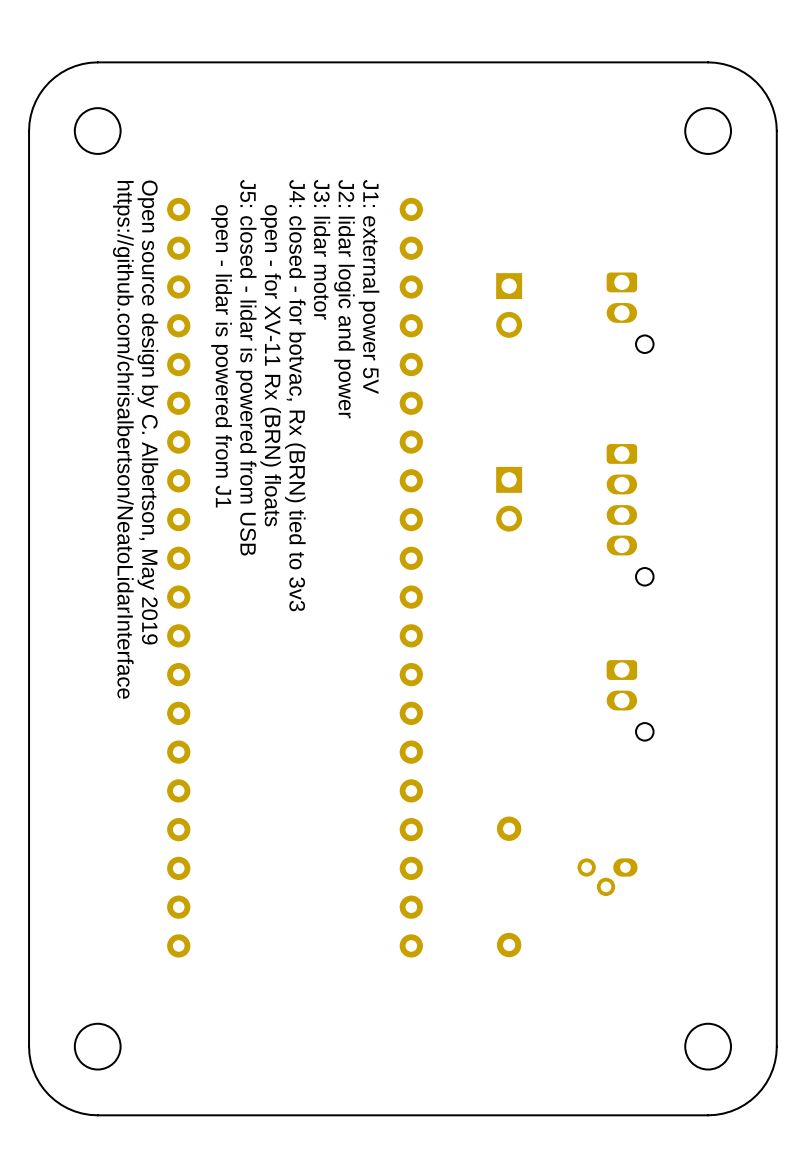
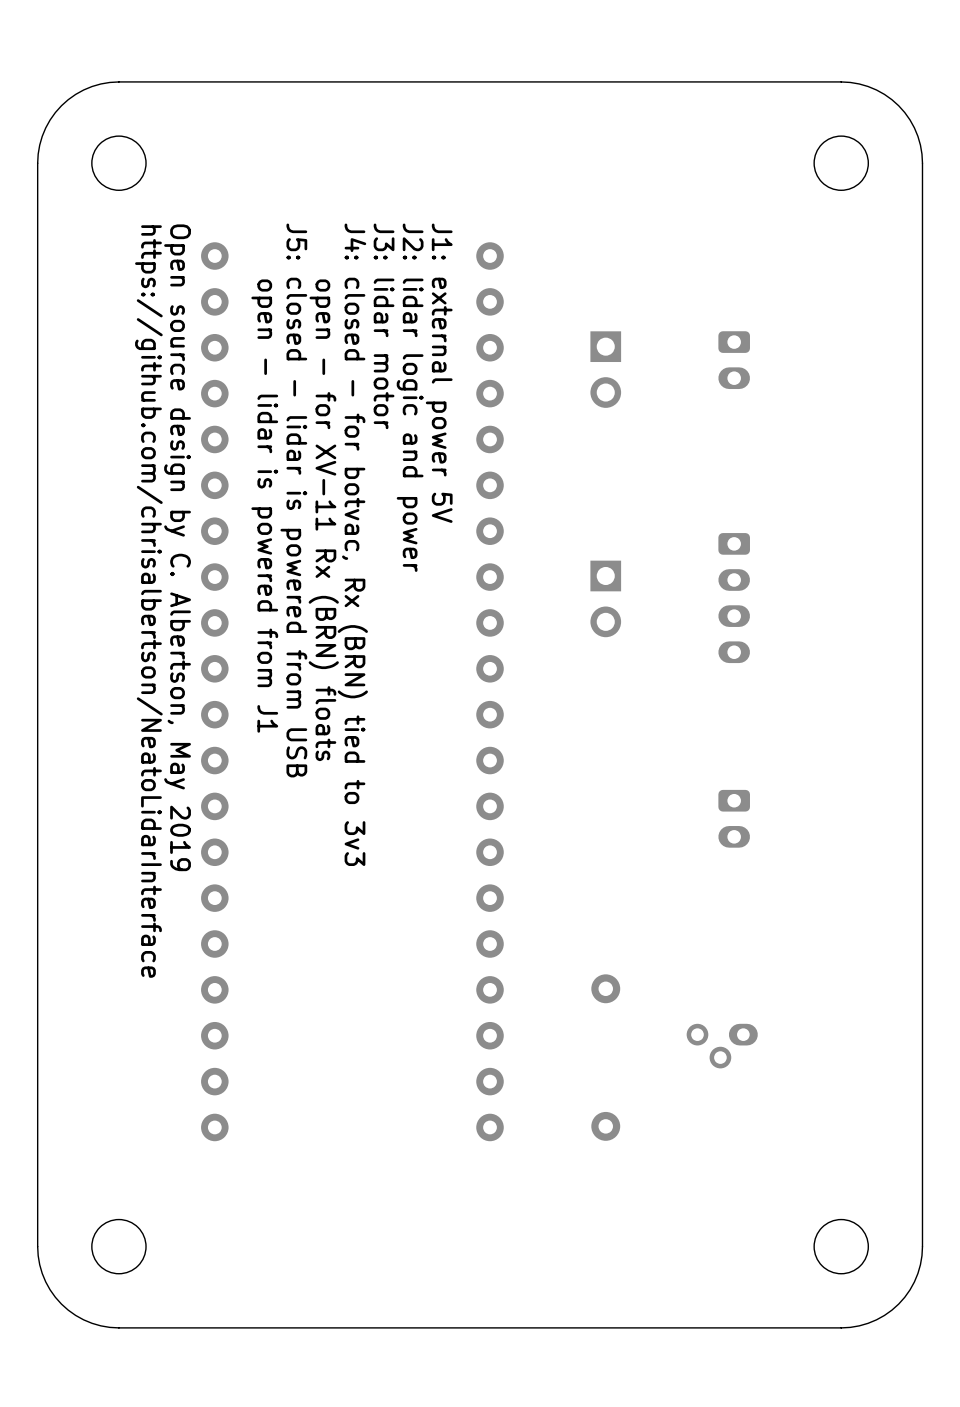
part: none -> (734, 360)
part: (630, 312) -> none
part: none -> (734, 598)
part: (630, 514) -> none
part: none -> (734, 818)
part: (630, 700) -> none

